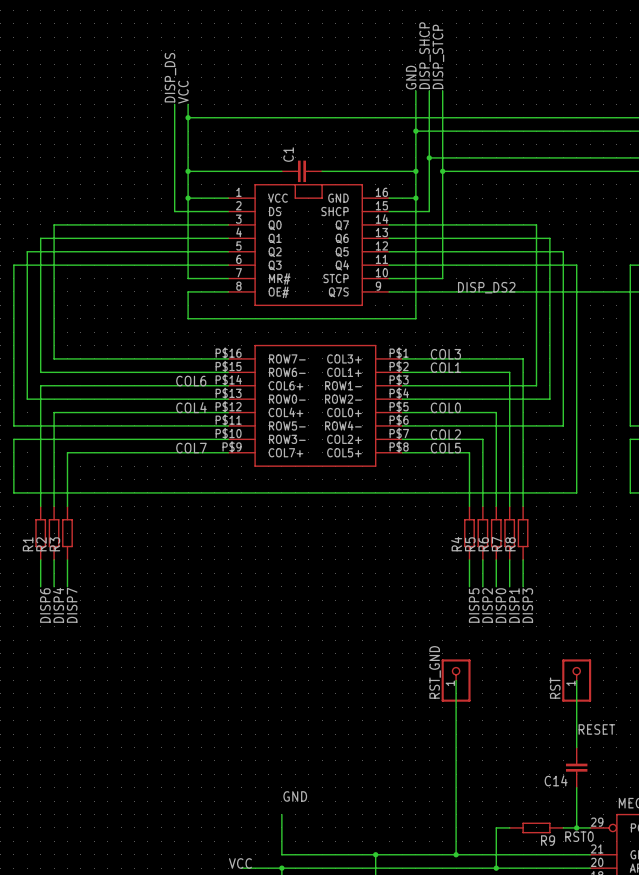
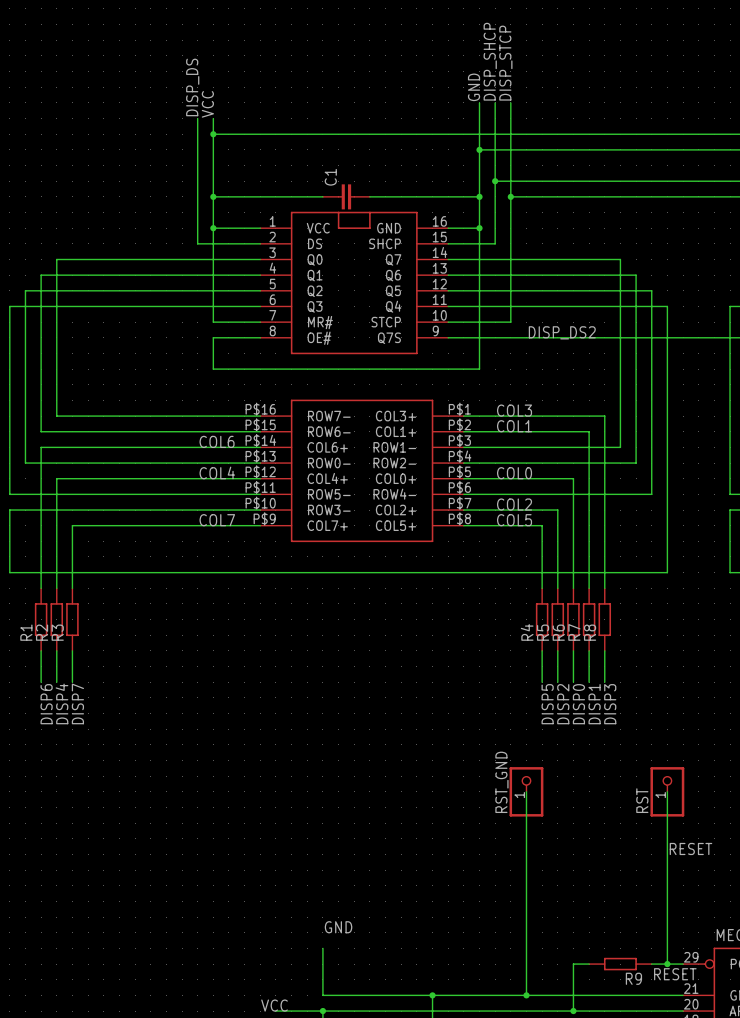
C14: (576, 767) -> none
label: RST0 (579, 836) -> RESET (675, 974)

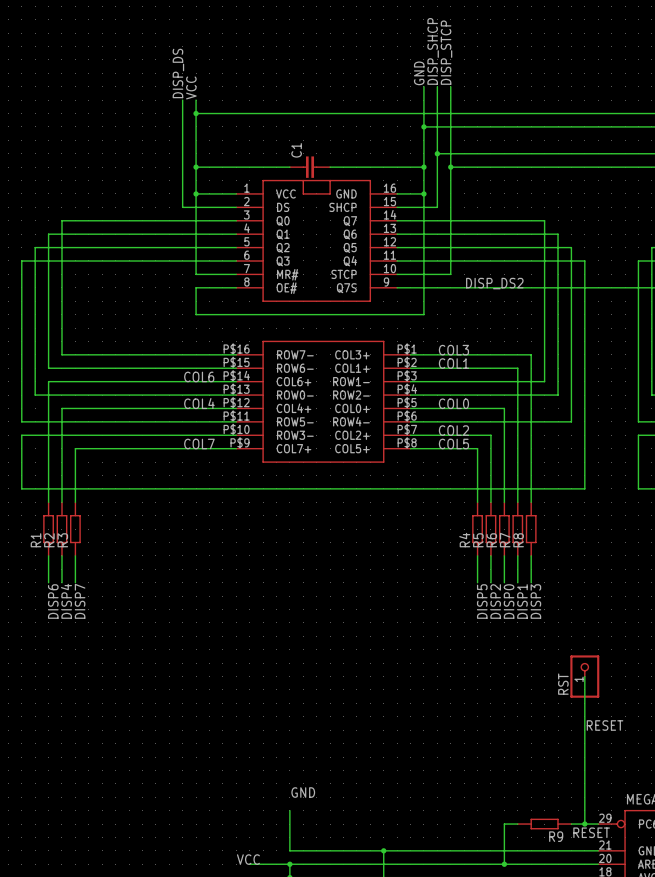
wire: (526, 791) (526, 995) -> none
RST_GND: (526, 791) -> none
junction: (526, 995) -> none

